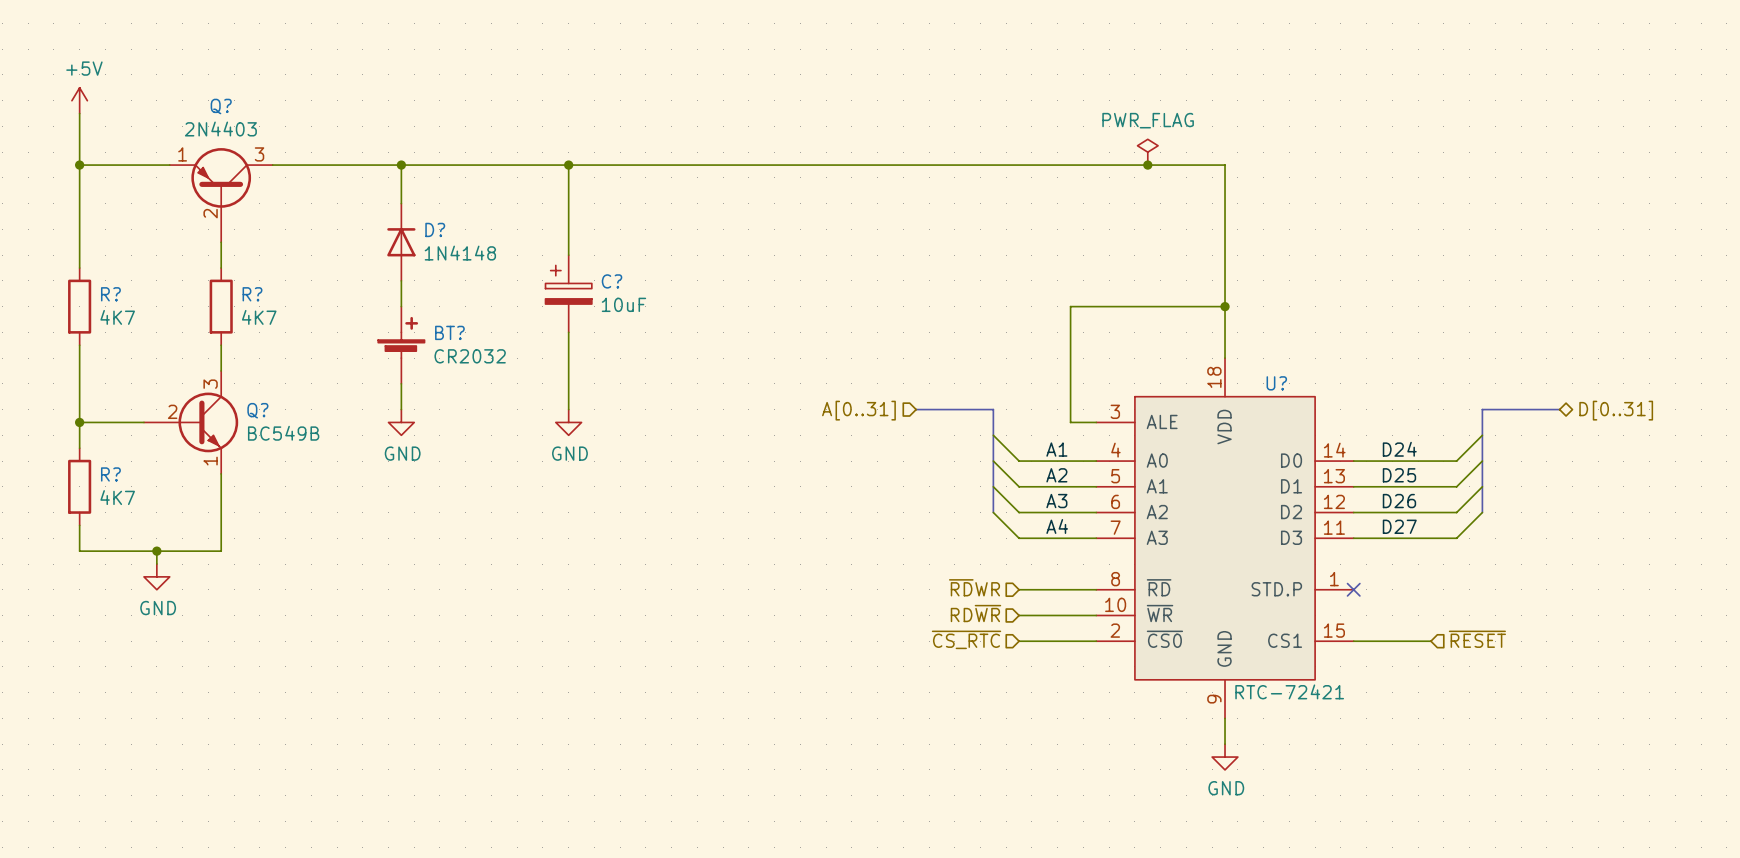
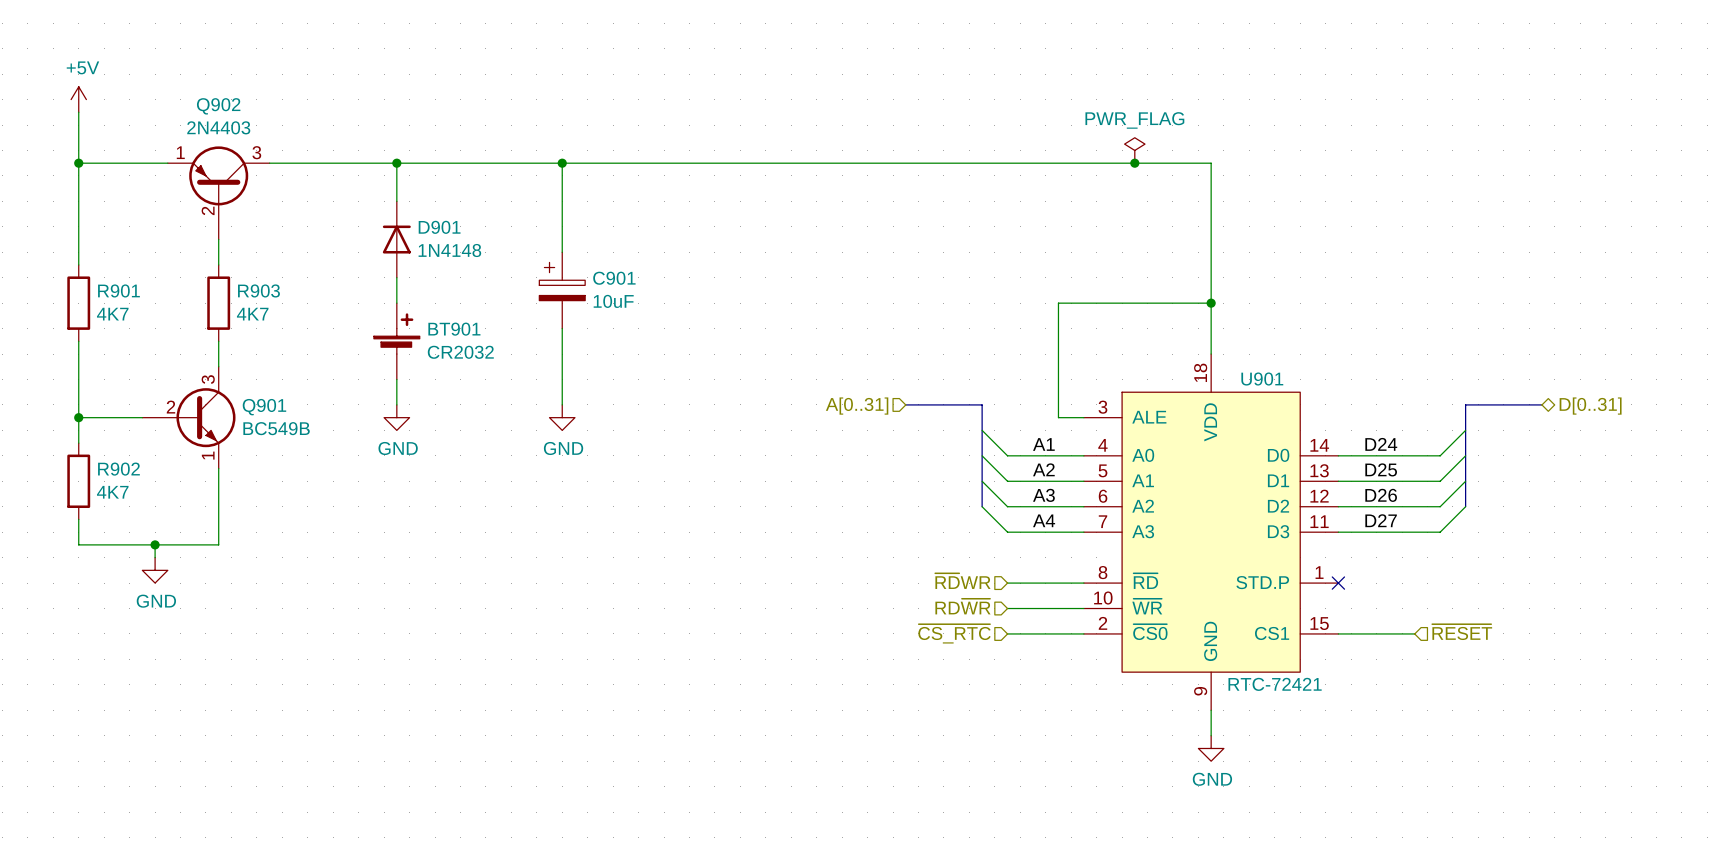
Q? name: Q? (221, 106) -> Q902 (218, 106)
D? name: D? (435, 229) -> D901 (439, 227)
C? name: C? (612, 281) -> C901 (614, 278)
R? name: R? (110, 294) -> R901 (118, 290)
R? name: R? (252, 294) -> R903 (258, 290)
BT? name: BT? (449, 332) -> BT901 (454, 329)
U? name: U? (1276, 383) -> U901 (1262, 379)
Q? name: Q? (257, 410) -> Q901 (264, 407)
R? name: R? (110, 474) -> R902 (118, 469)

